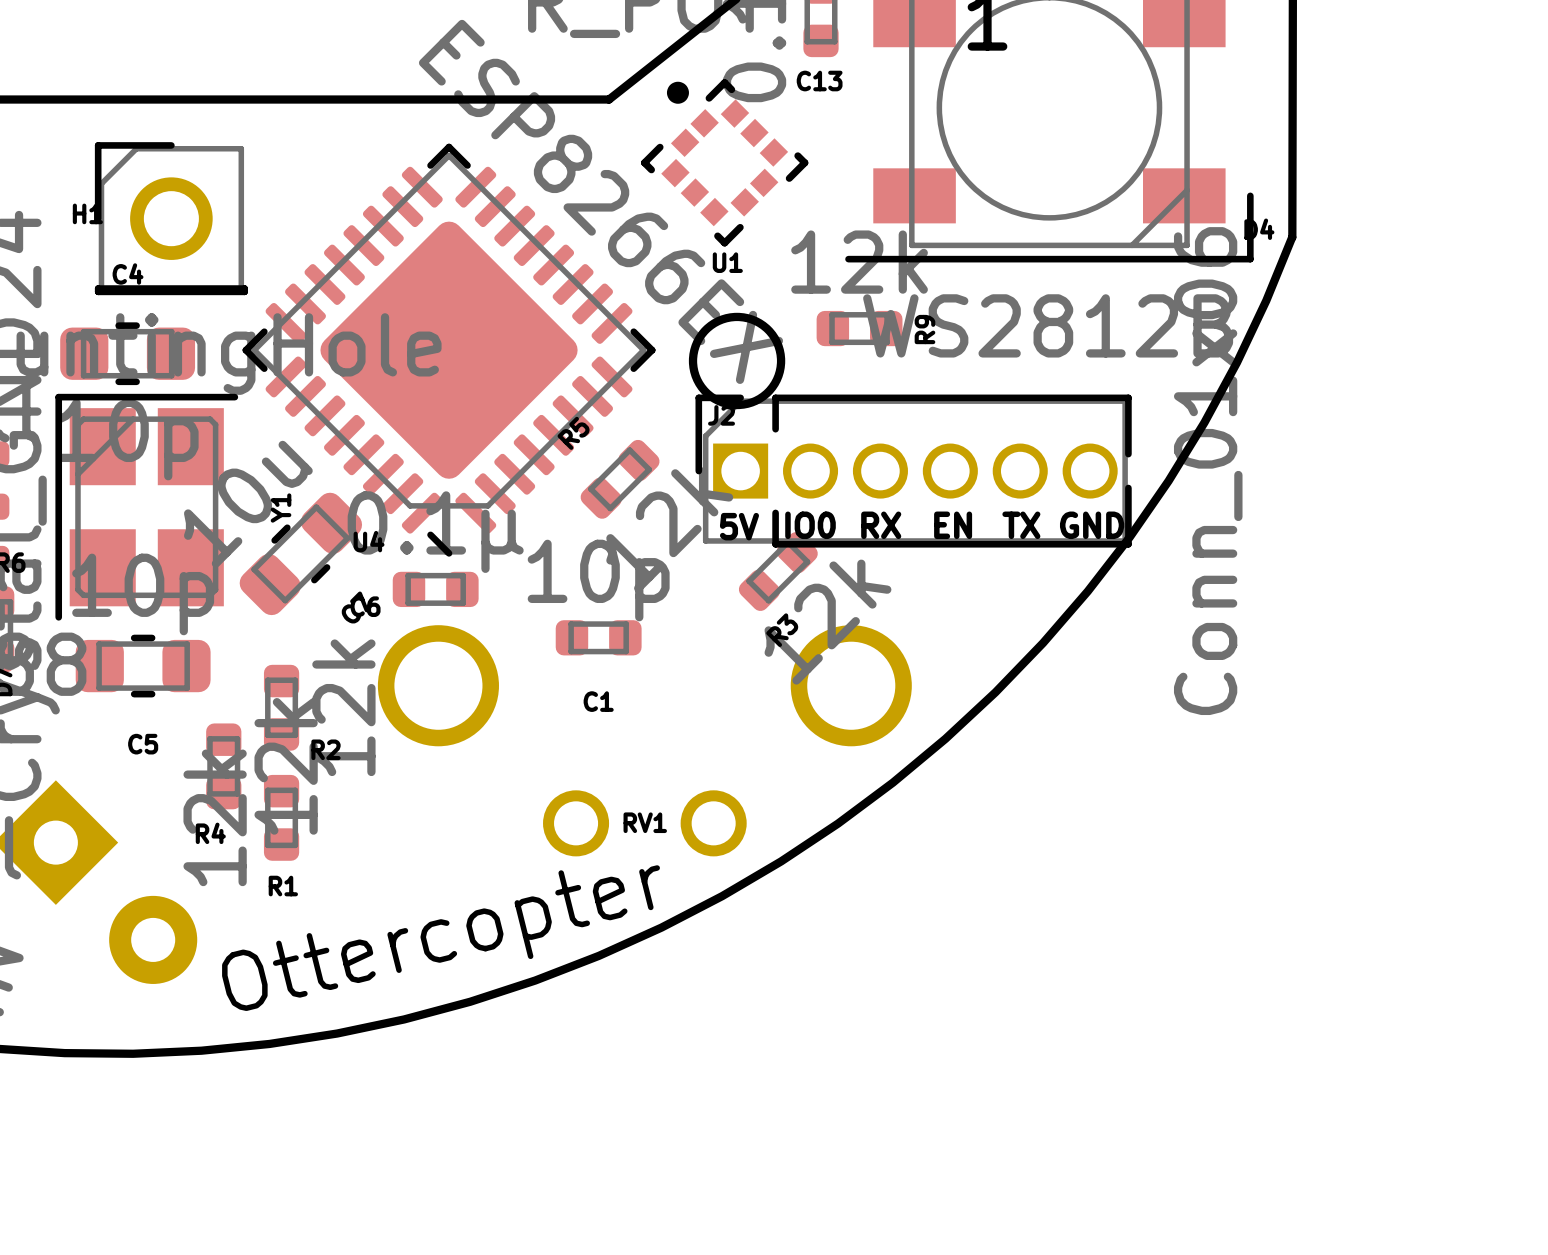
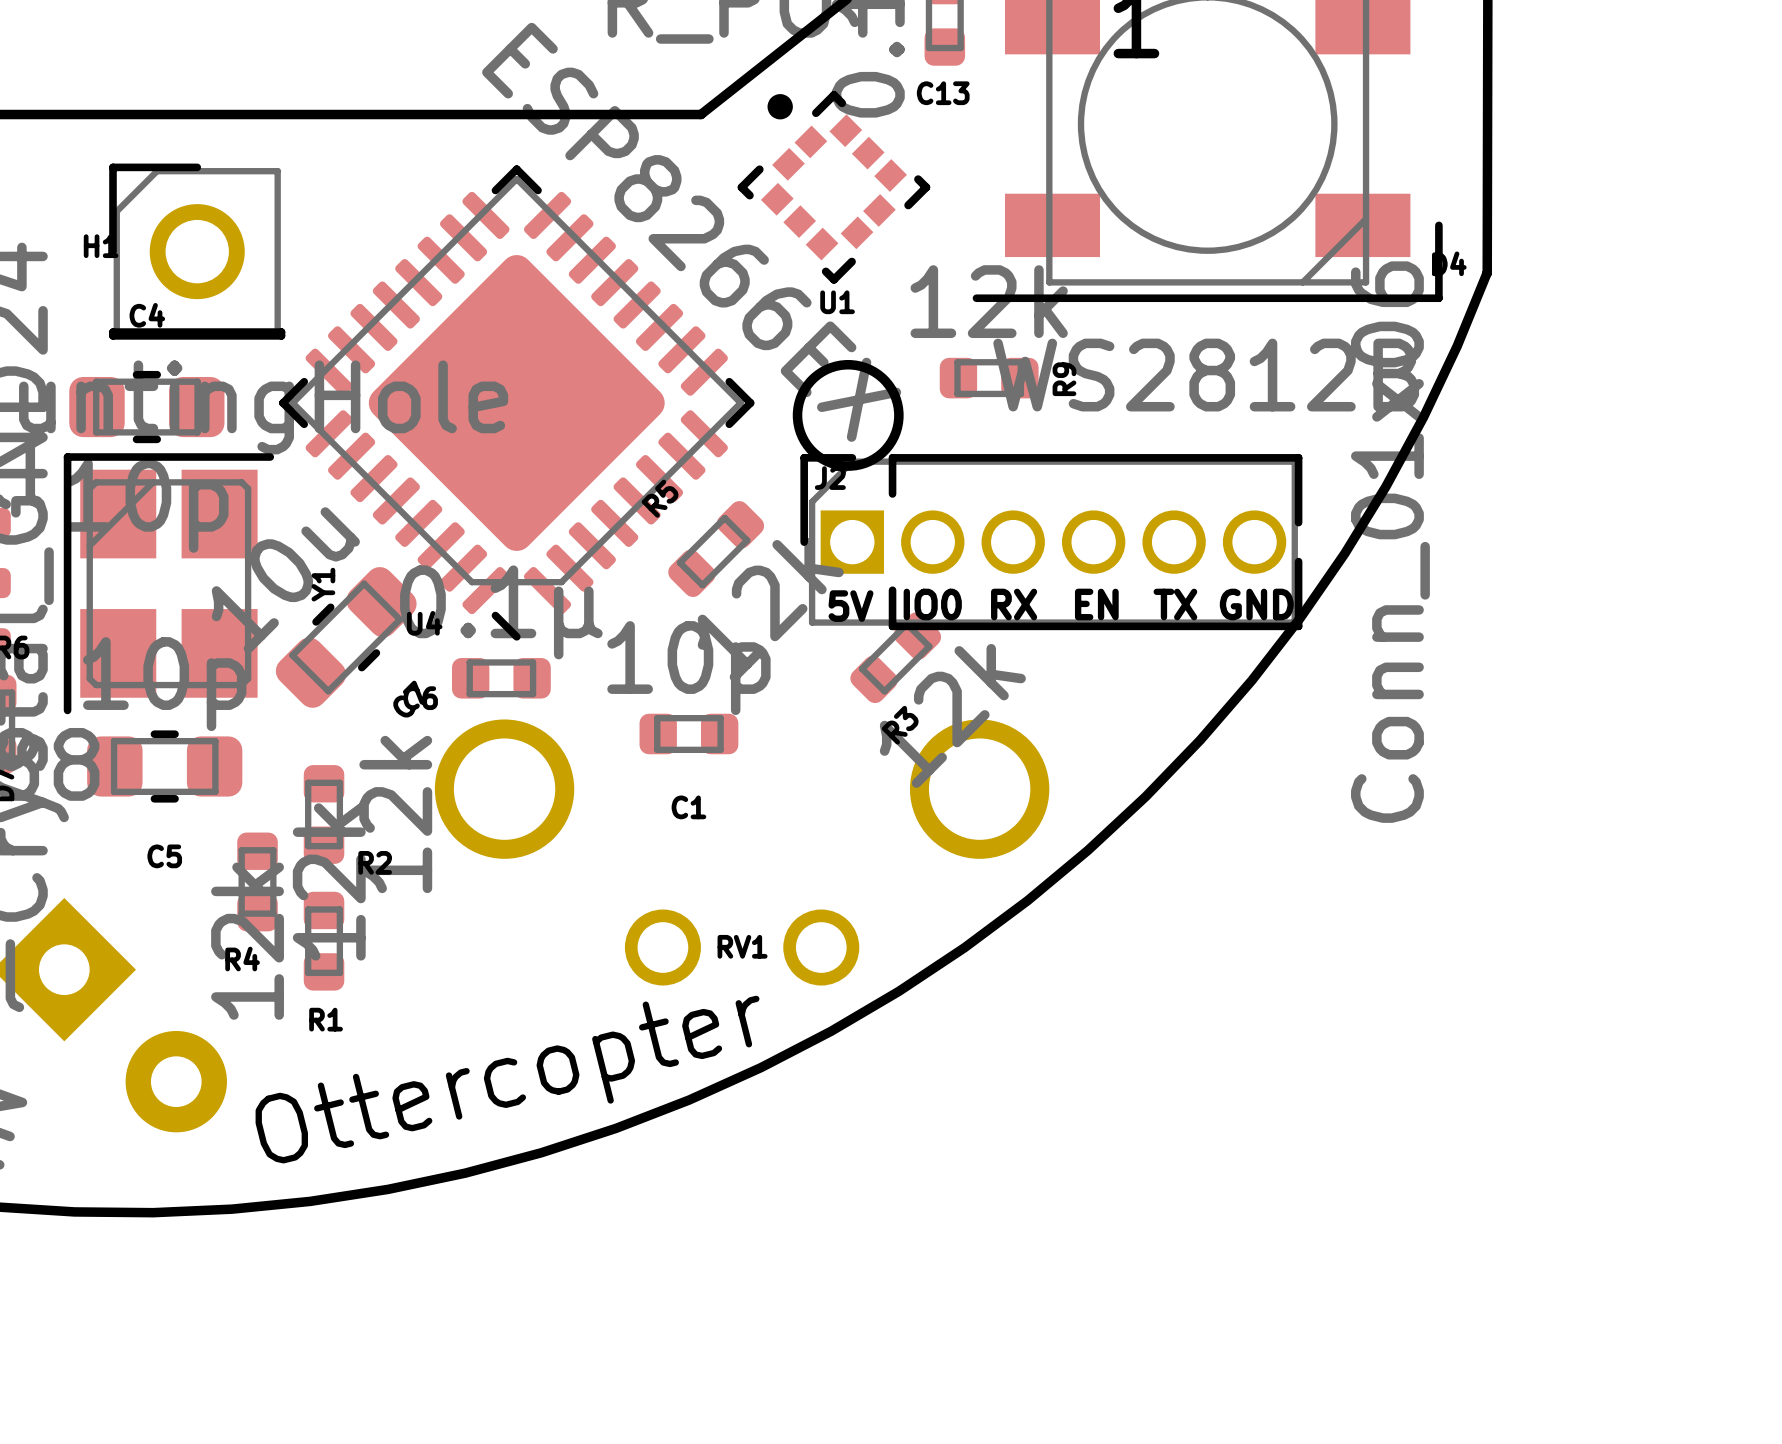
R5 footprint: [580, 439, 660, 519] -> [668, 501, 765, 598]

